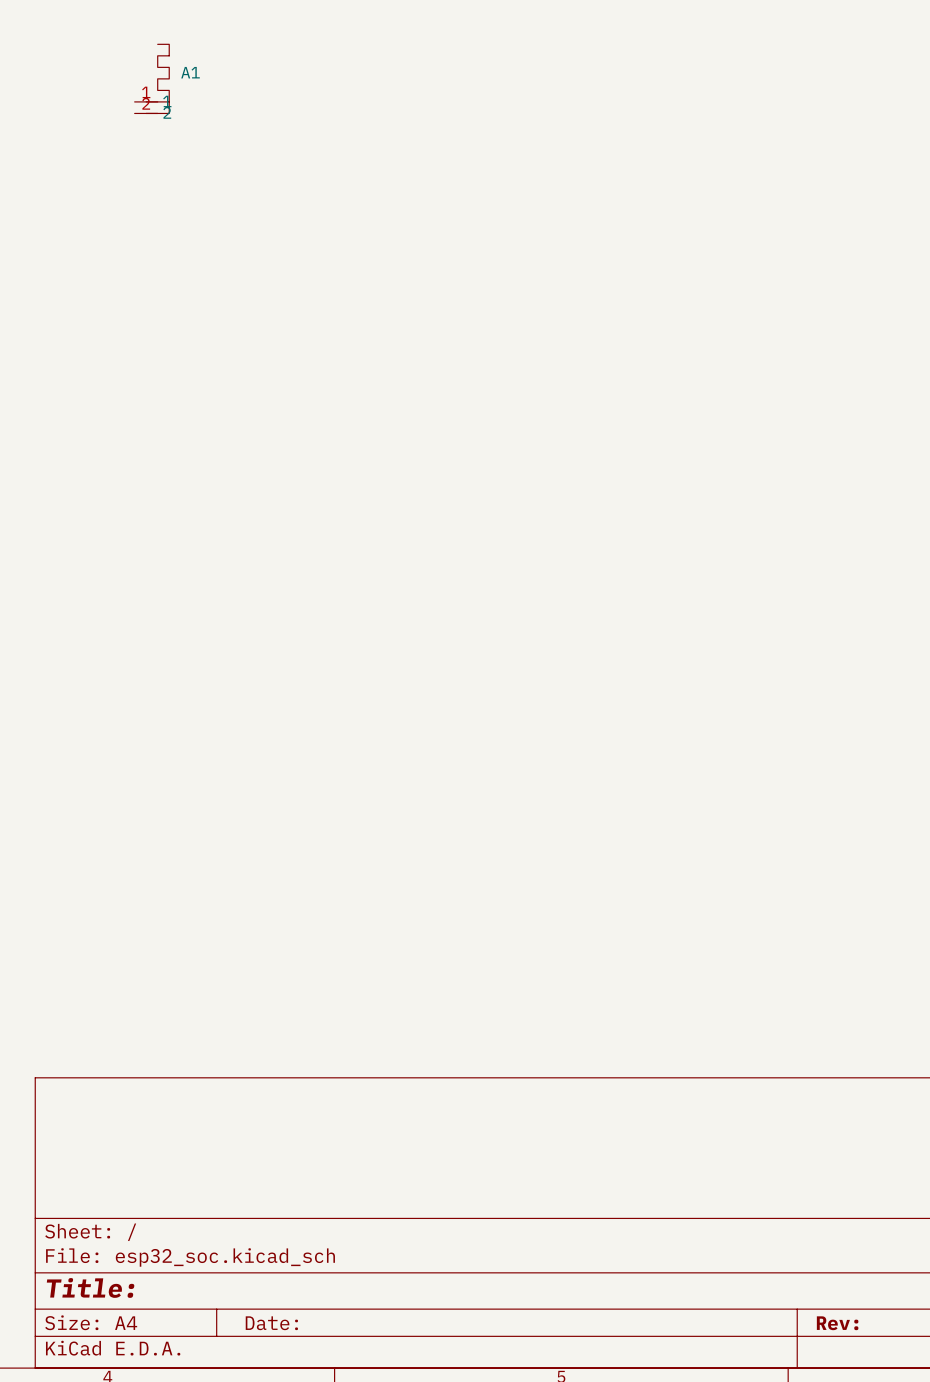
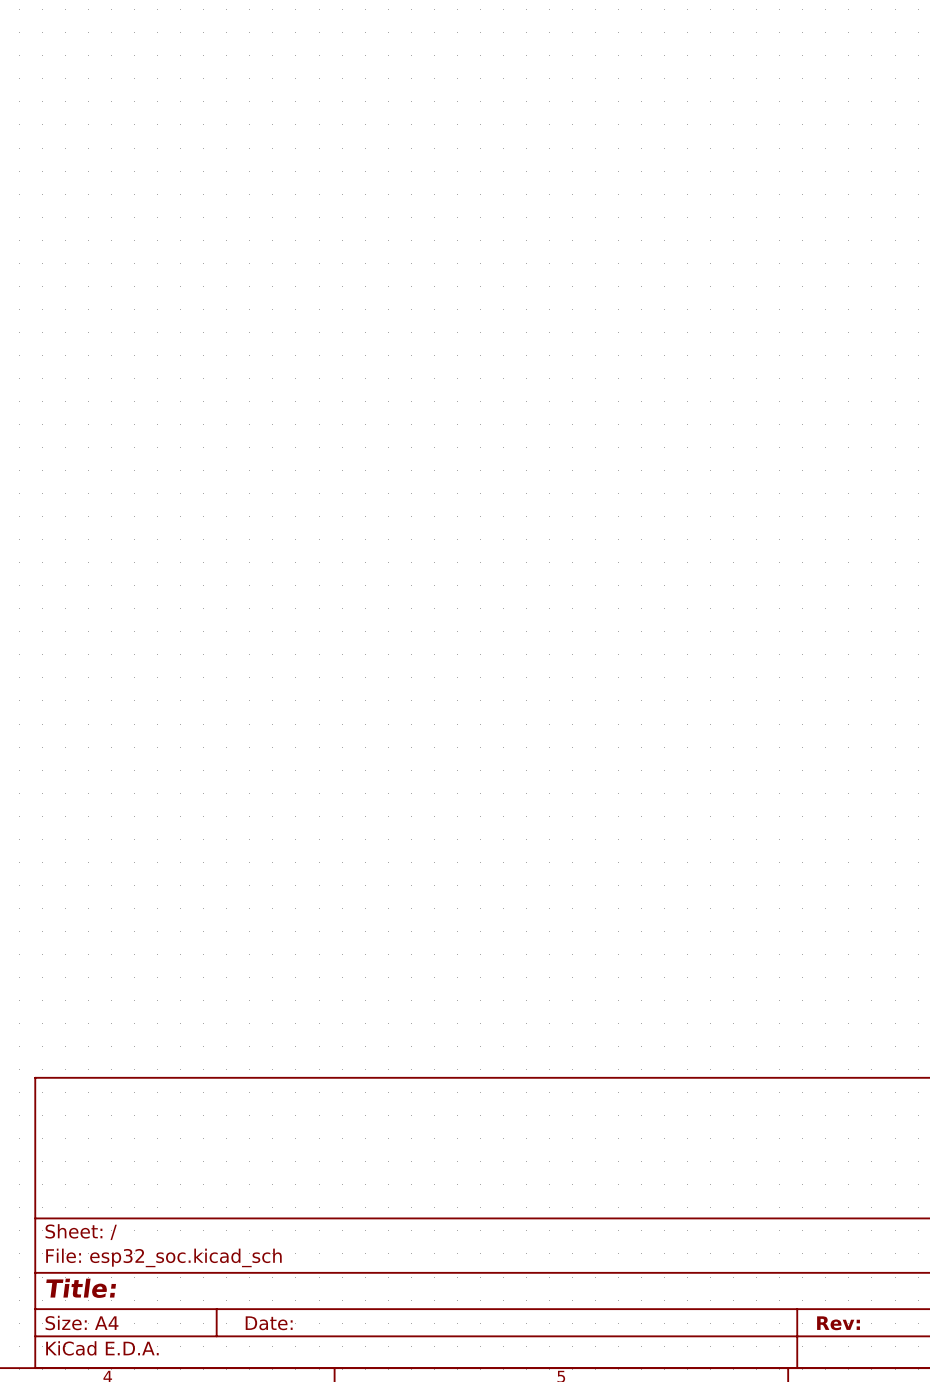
A1: (151, 78) -> none

